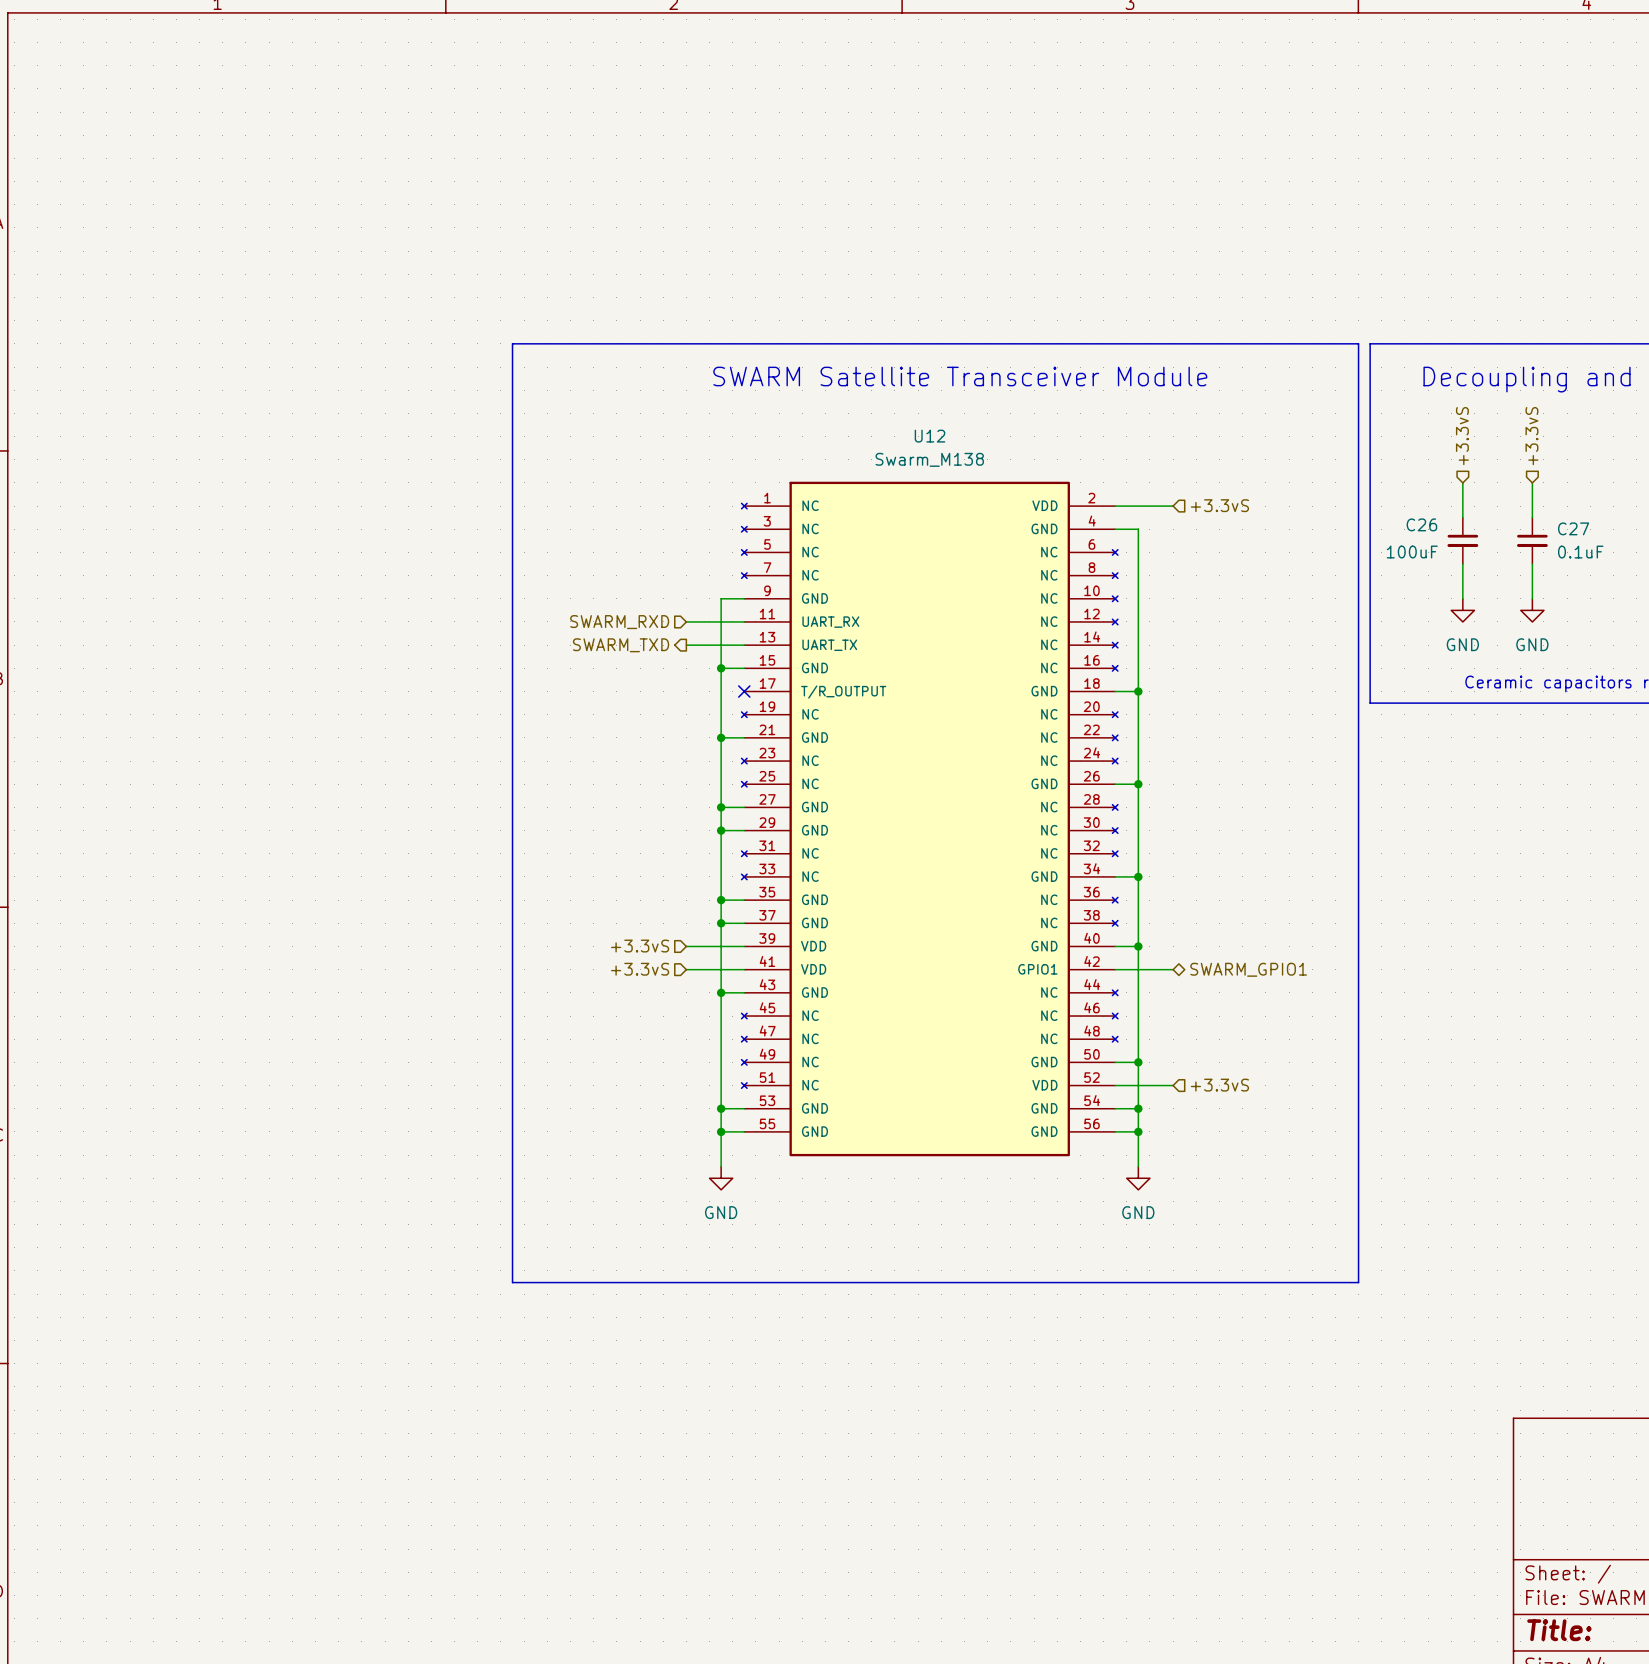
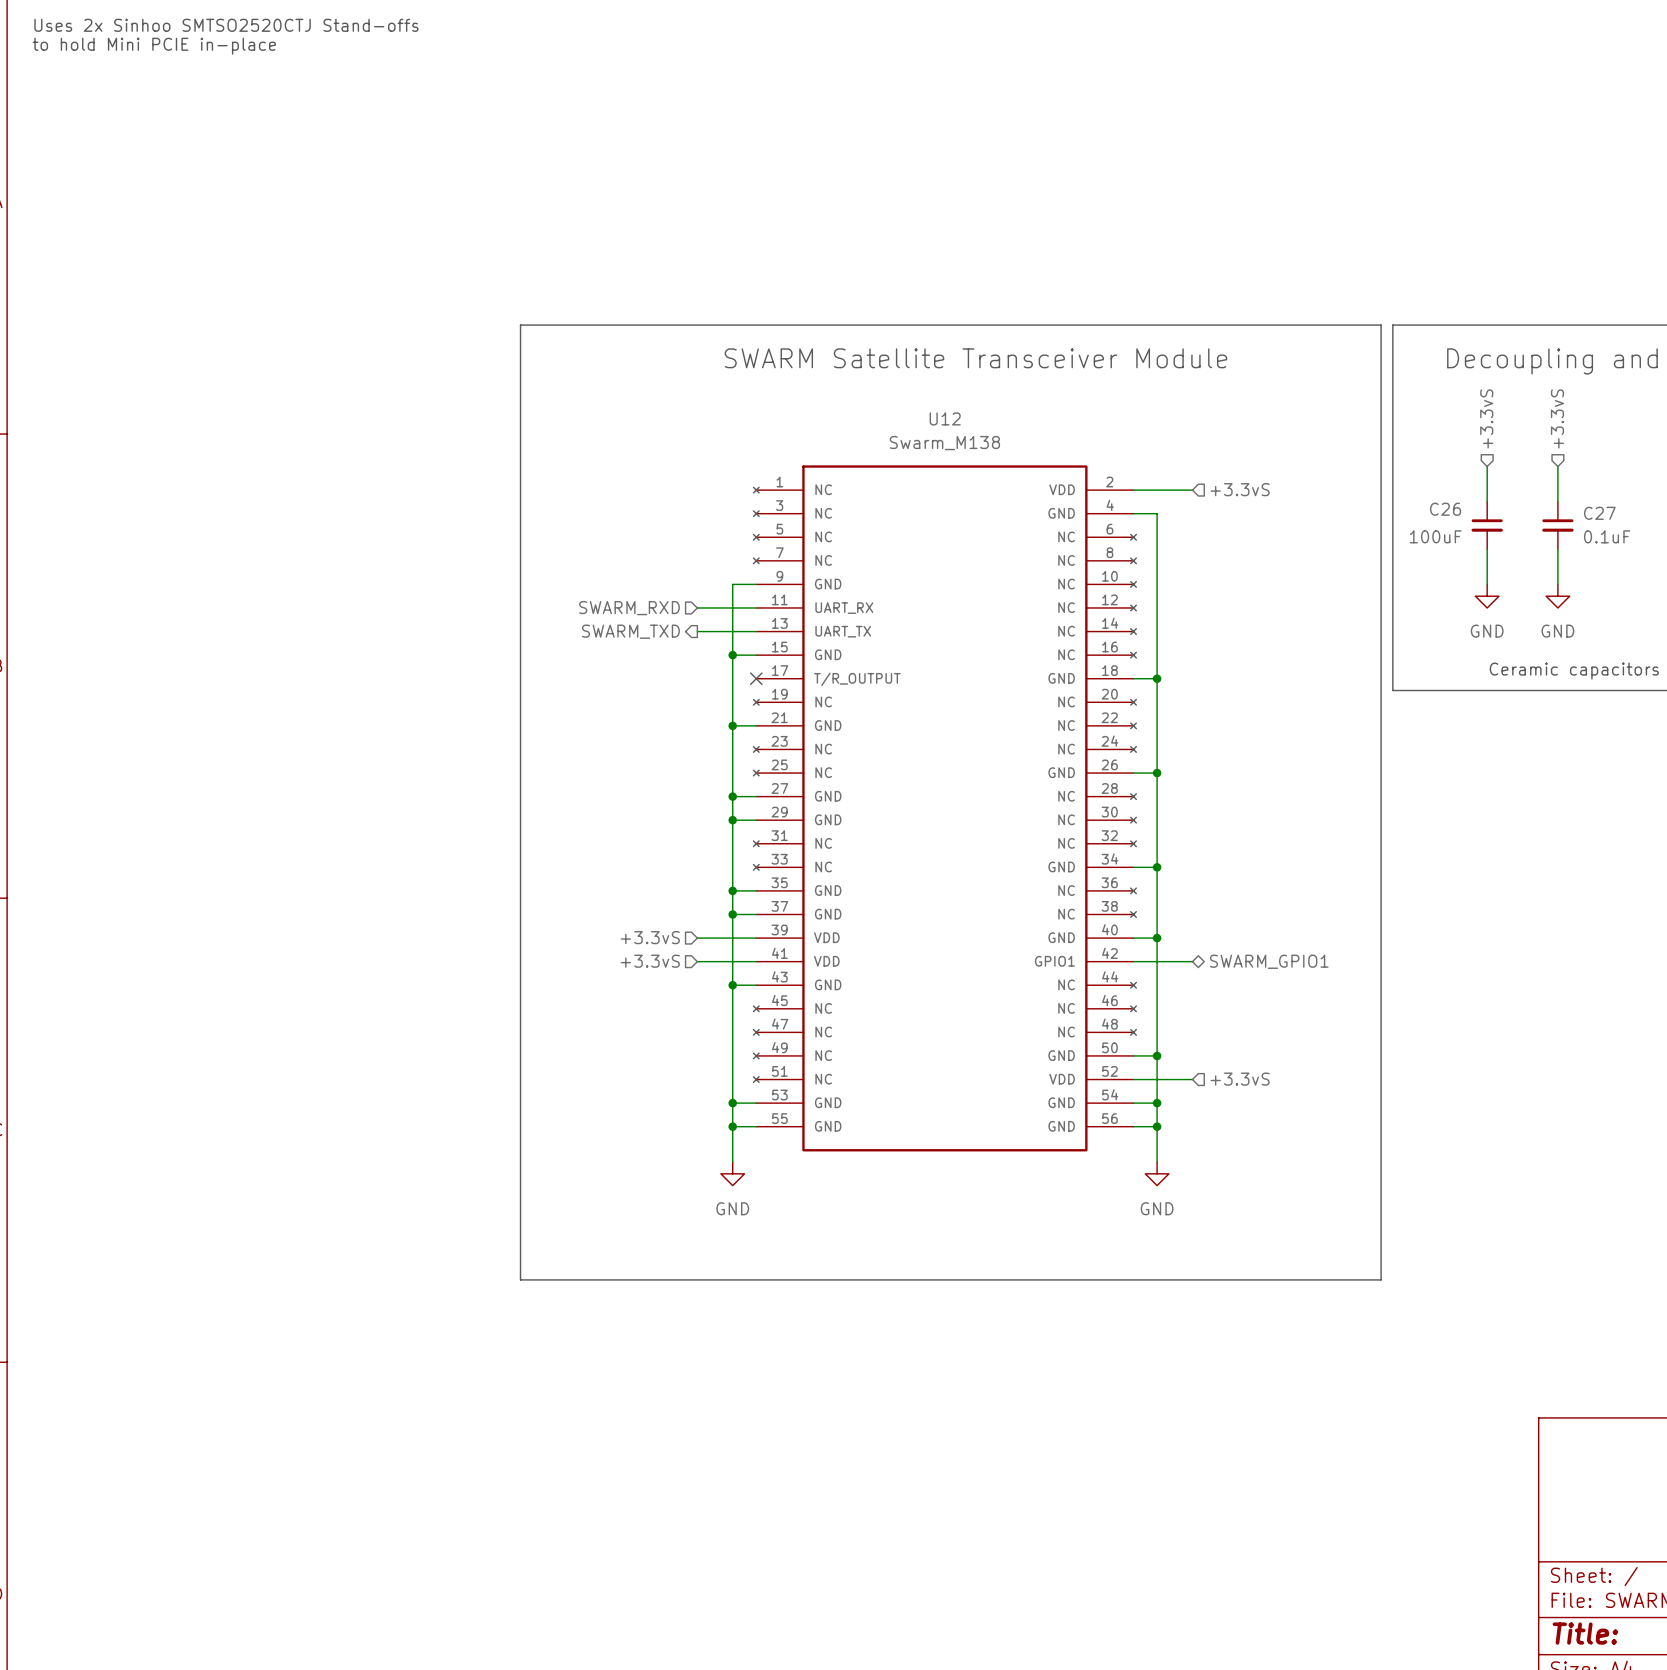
text: none -> Uses 2x Sinhoo SMTSO2520CTJ Stand-offs (226, 25)
text: none -> to hold Mini PCIE in-place (154, 46)

